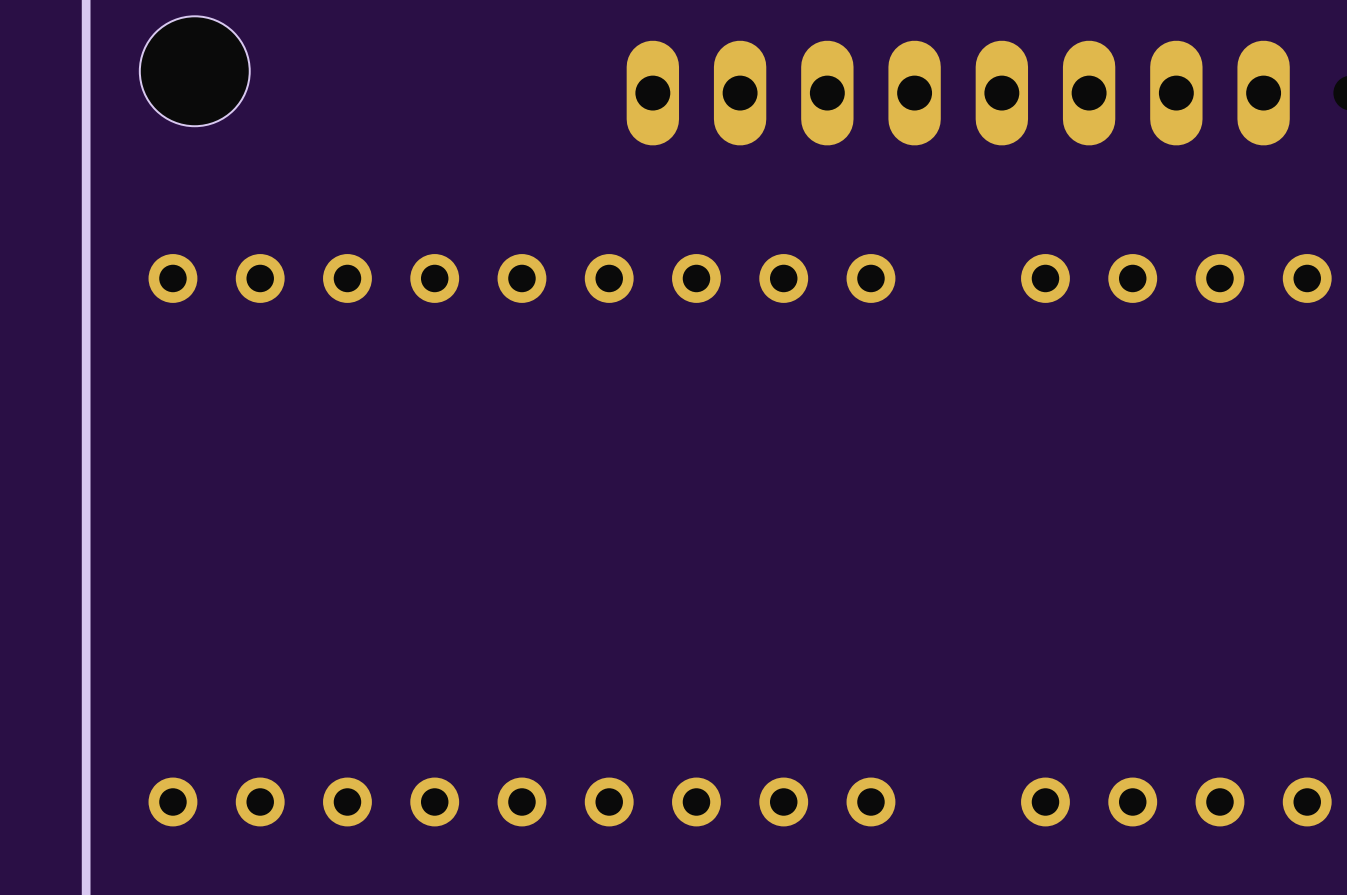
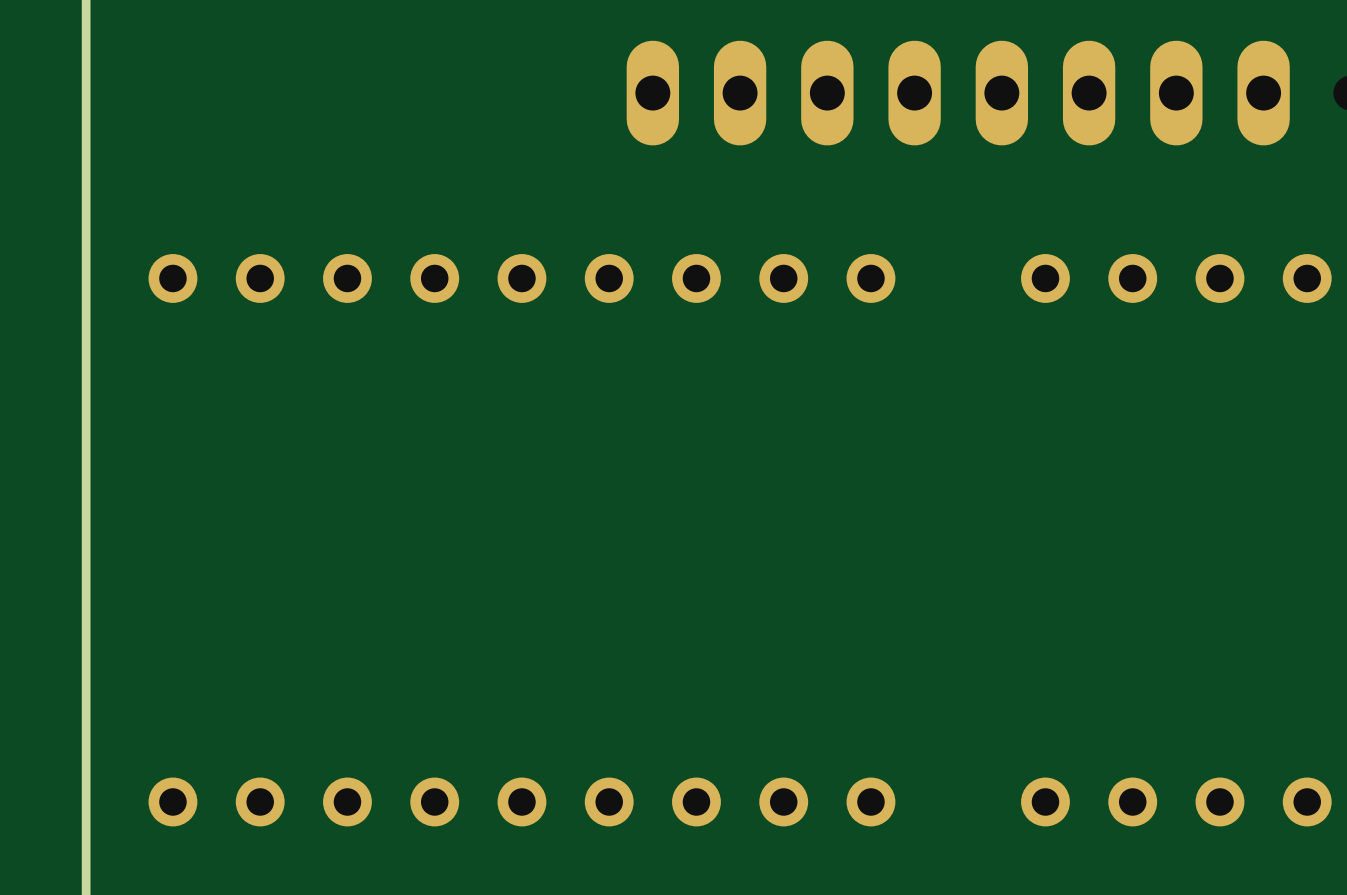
hole: (194, 71) -> none

